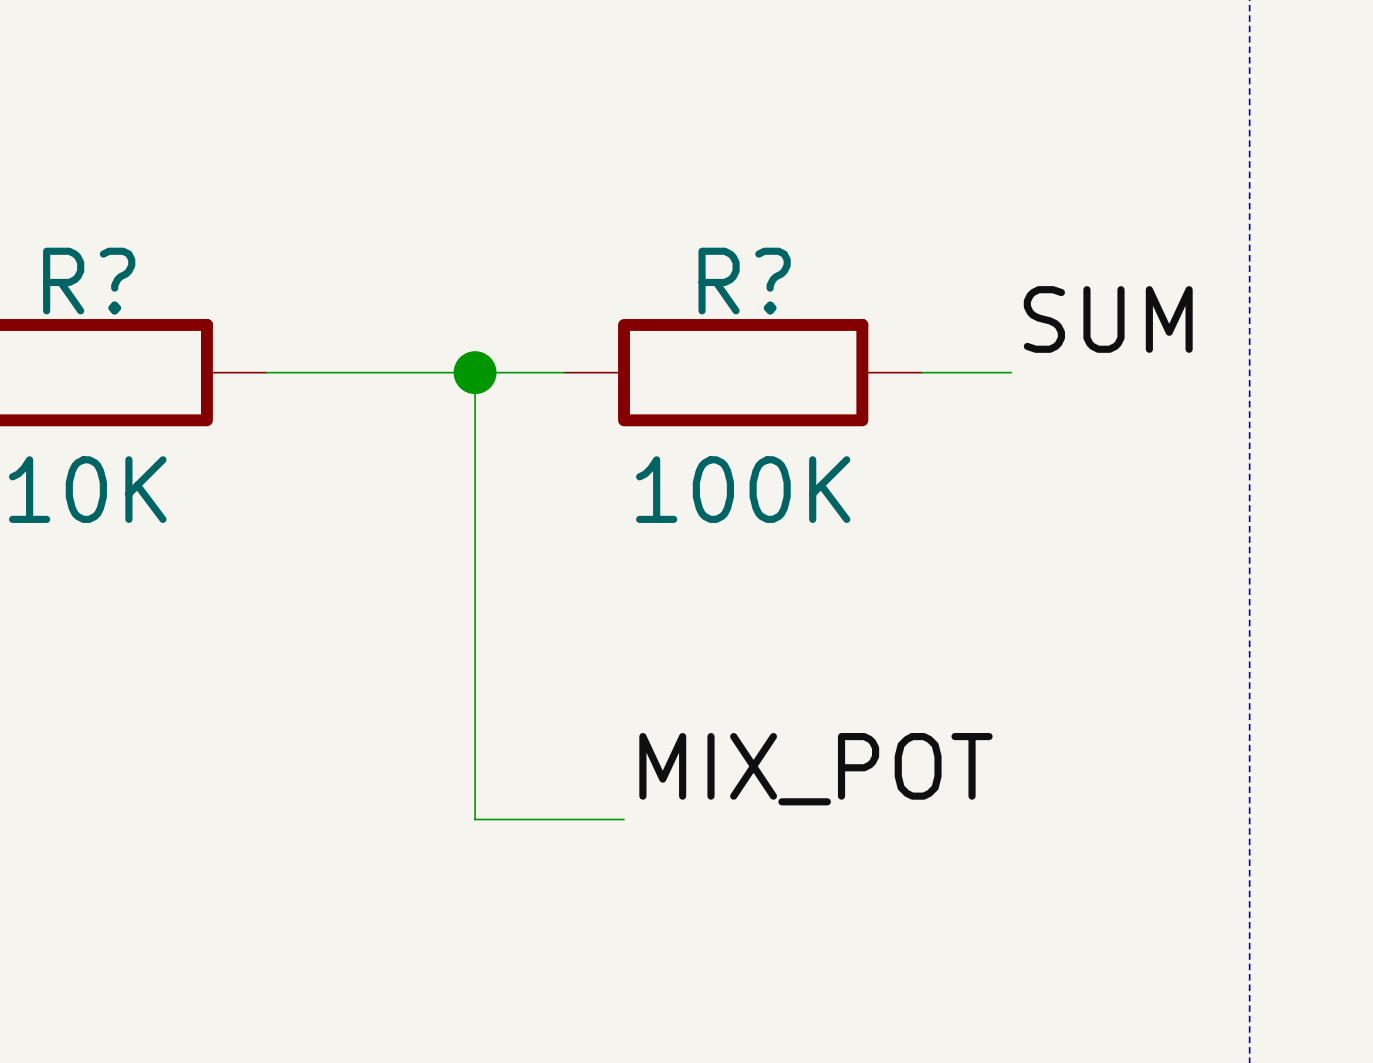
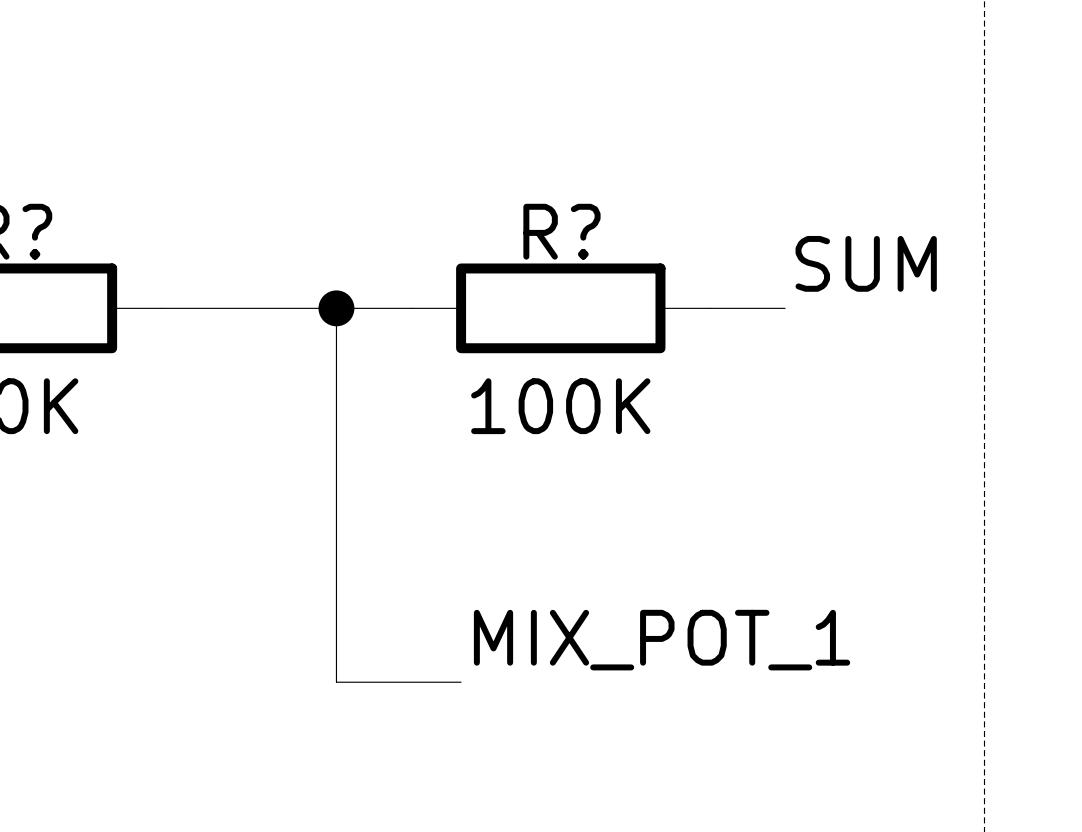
label: MIX_POT (815, 769) -> MIX_POT_1 (662, 640)

